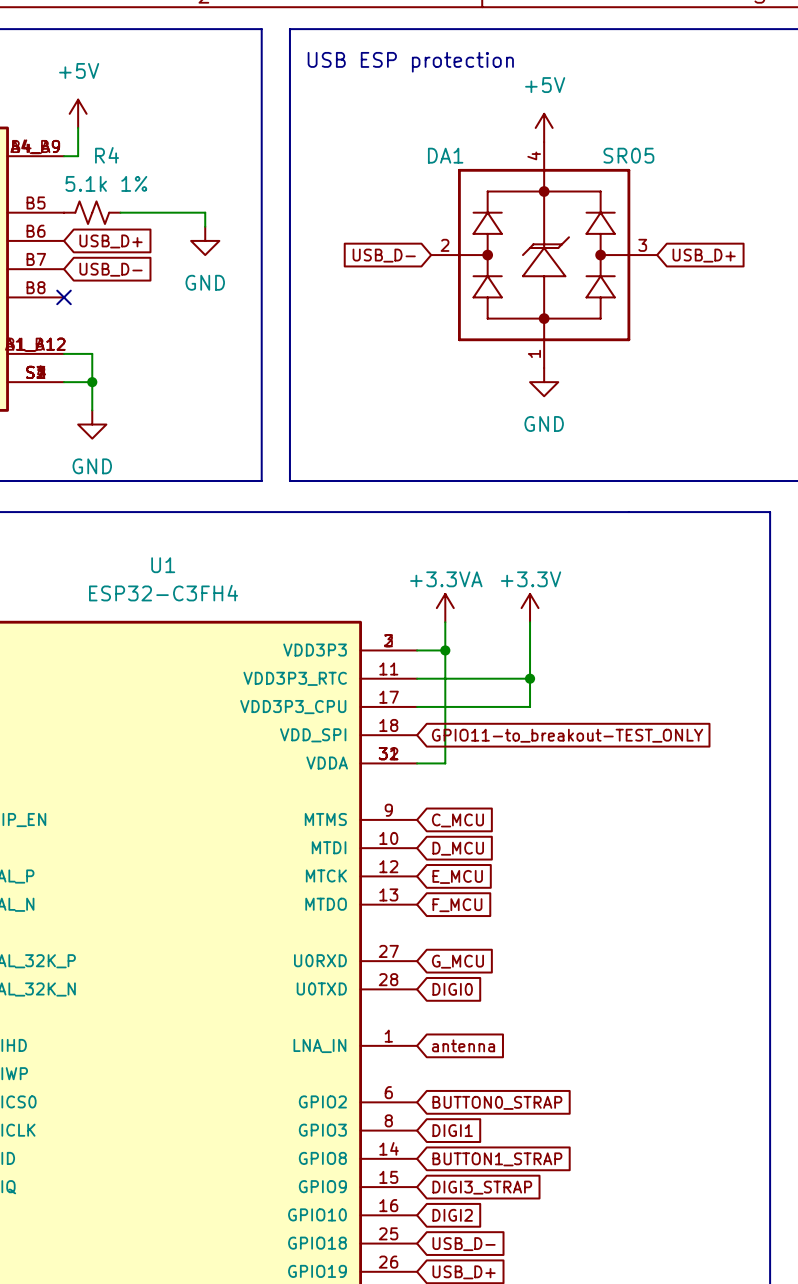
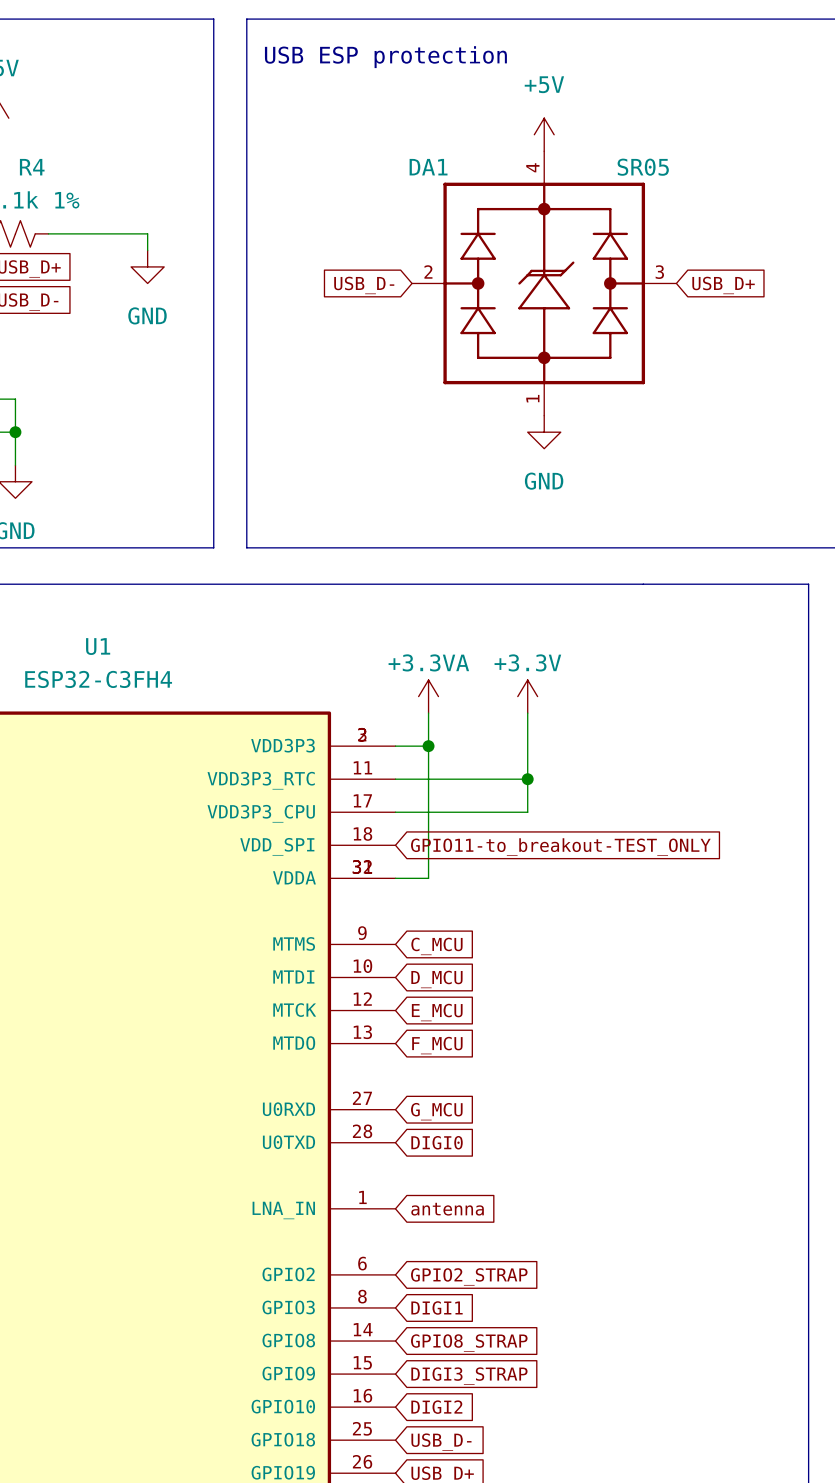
global label: BUTTON0_STRAP (497, 1102) -> GPIO2_STRAP (469, 1276)
global label: BUTTON1_STRAP (497, 1159) -> GPIO8_STRAP (469, 1343)

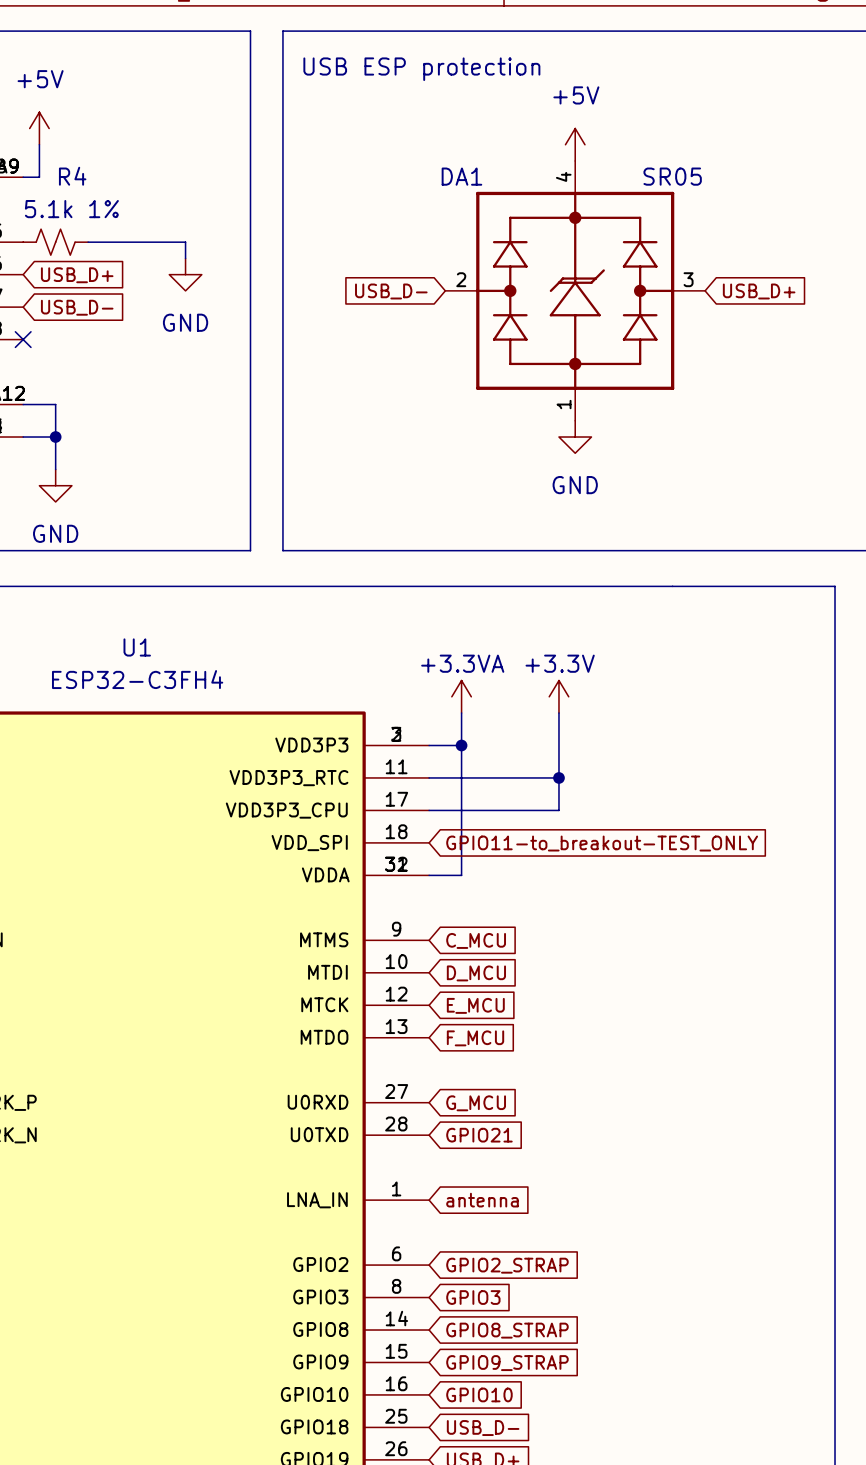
global label: DIGI0 (437, 1142) -> GPIO21 (479, 1135)
global label: DIGI1 (437, 1307) -> GPIO3 (473, 1297)
global label: DIGI3_STRAP (469, 1376) -> GPIO9_STRAP (507, 1363)
global label: DIGI2 (436, 1407) -> GPIO10 (479, 1394)

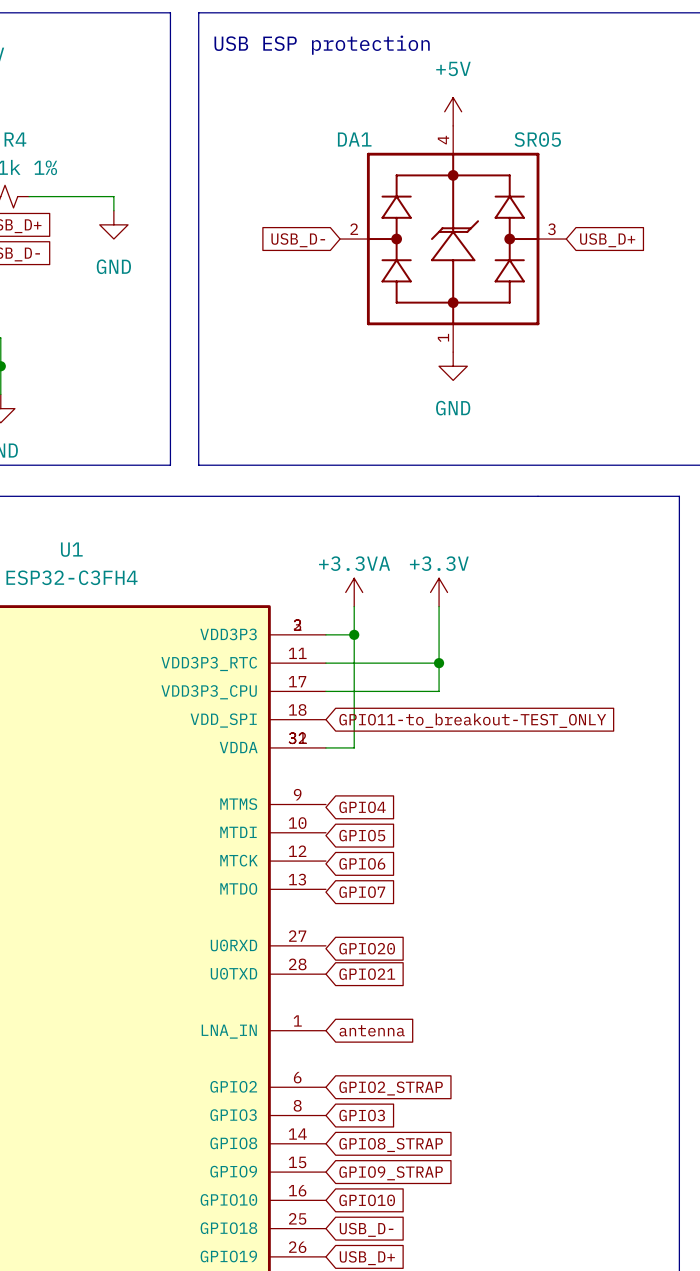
global label: C_MCU (476, 940) -> GPIO4 (362, 807)
global label: D_MCU (476, 973) -> GPIO5 (362, 835)
global label: E_MCU (475, 1005) -> GPIO6 (362, 863)
global label: F_MCU (475, 1038) -> GPIO7 (362, 892)
global label: G_MCU (476, 1103) -> GPIO20 (367, 948)

